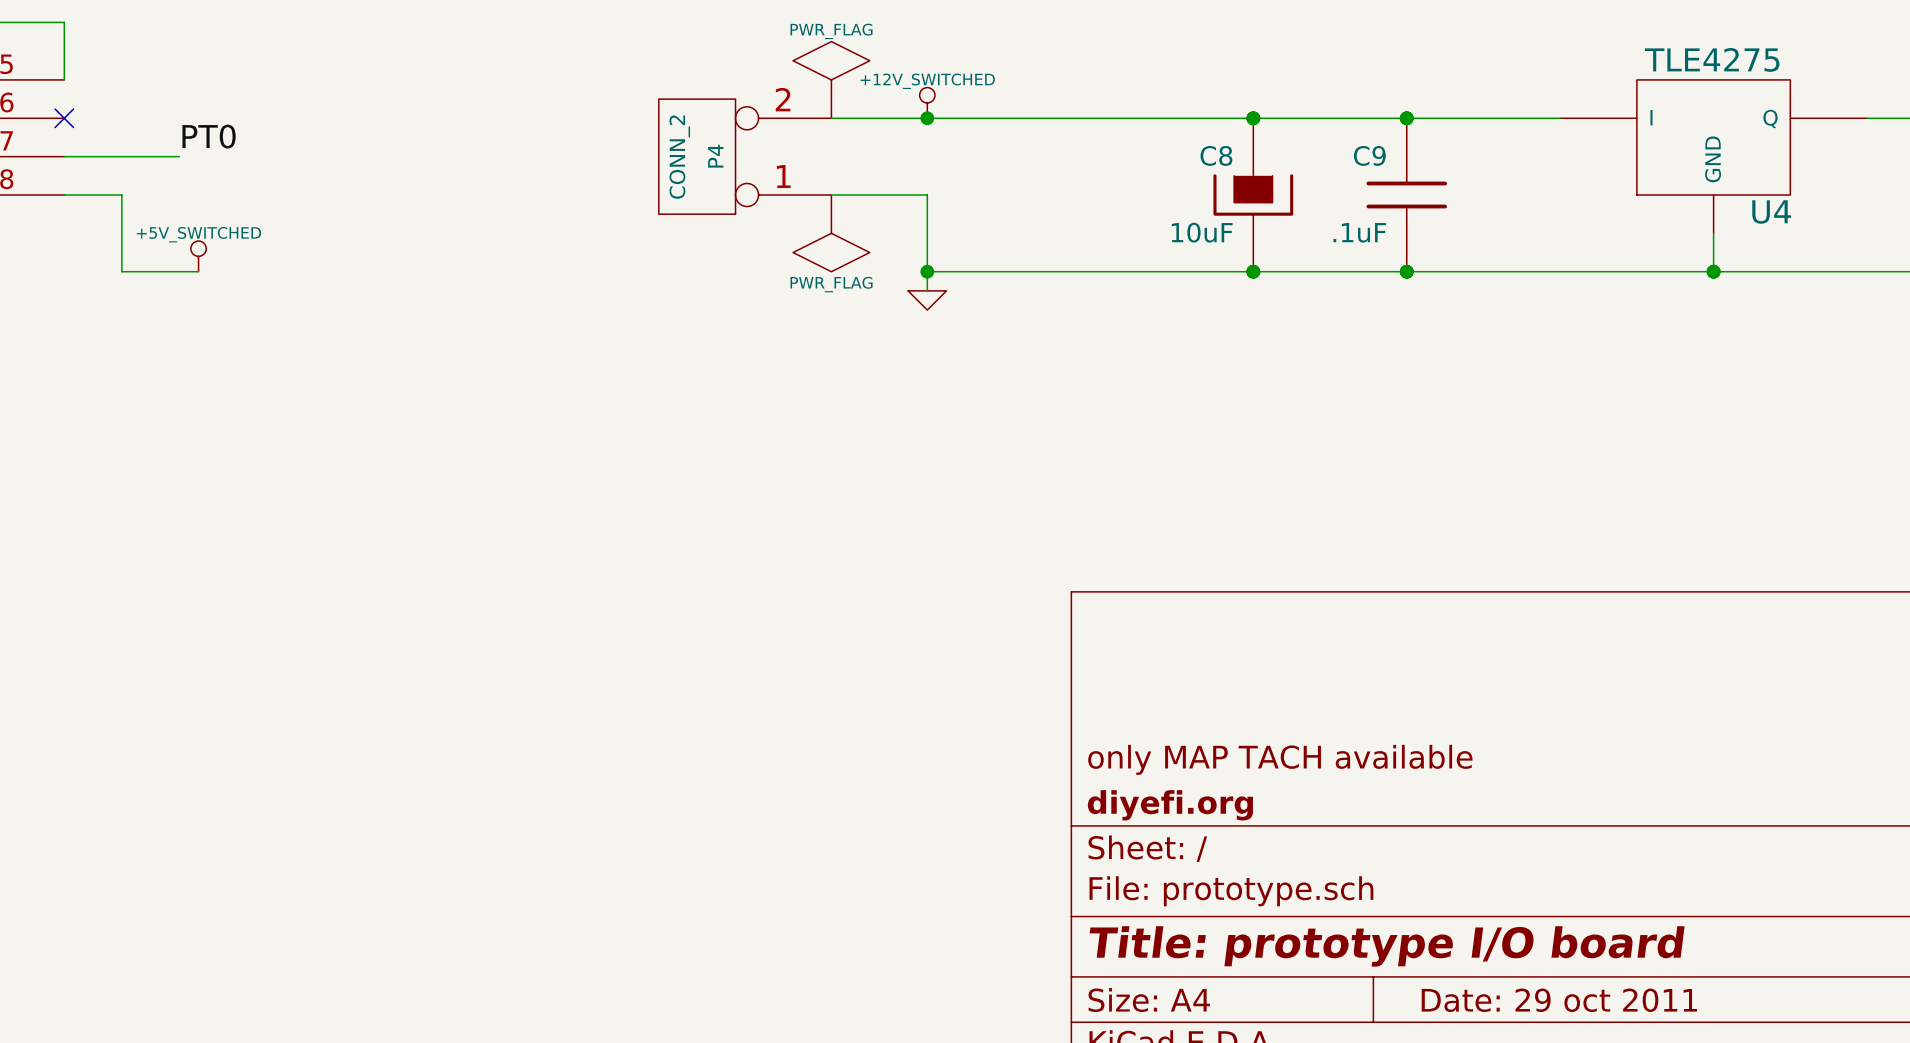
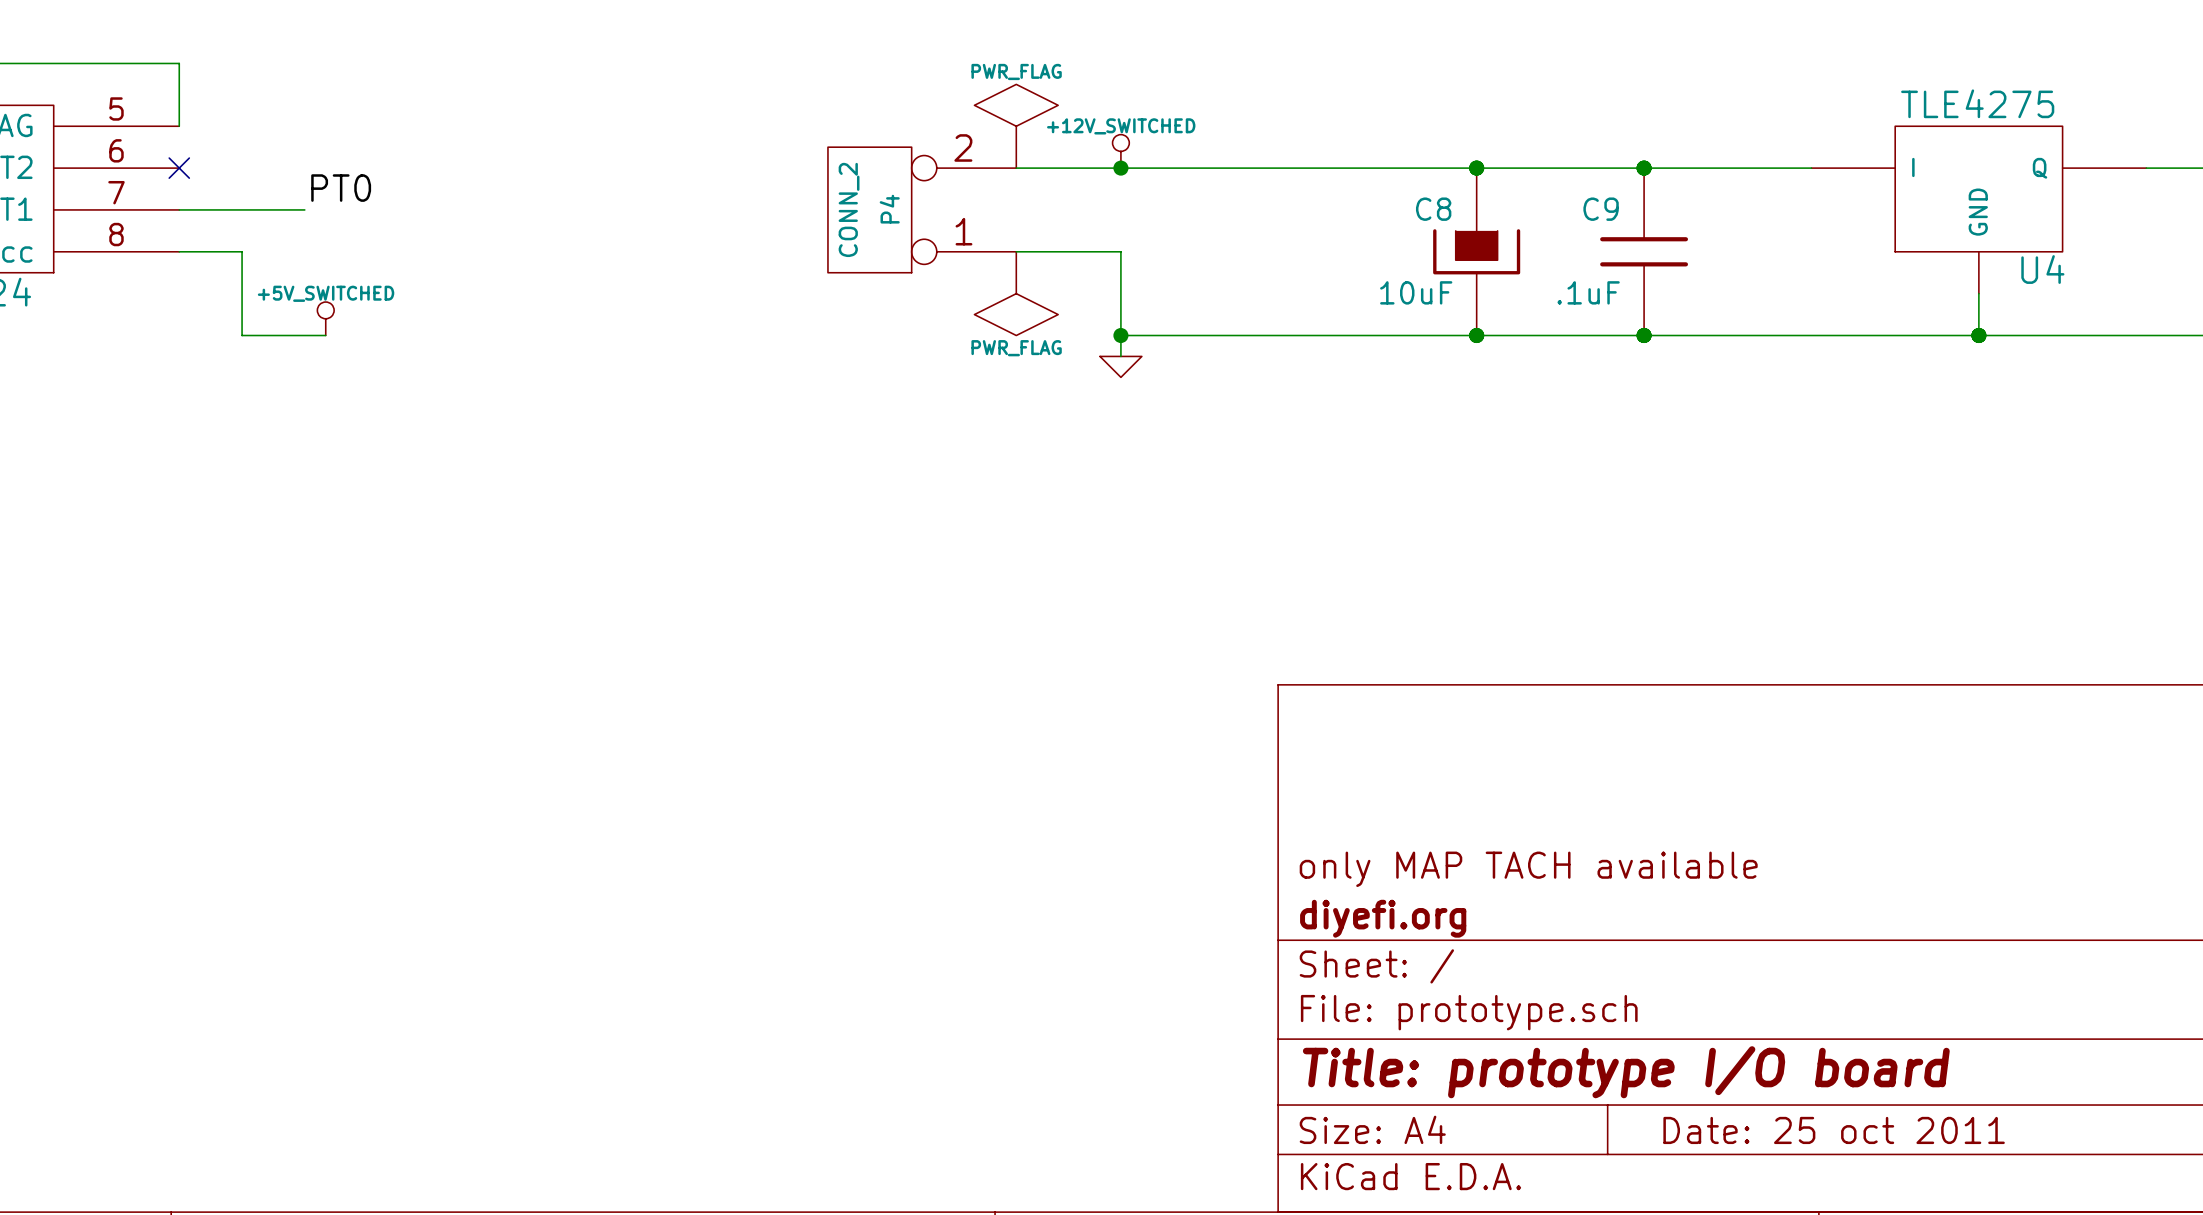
title block: Date: 29 oct 2011 (1559, 1000) -> Date: 25 oct 2011 (1834, 1130)

